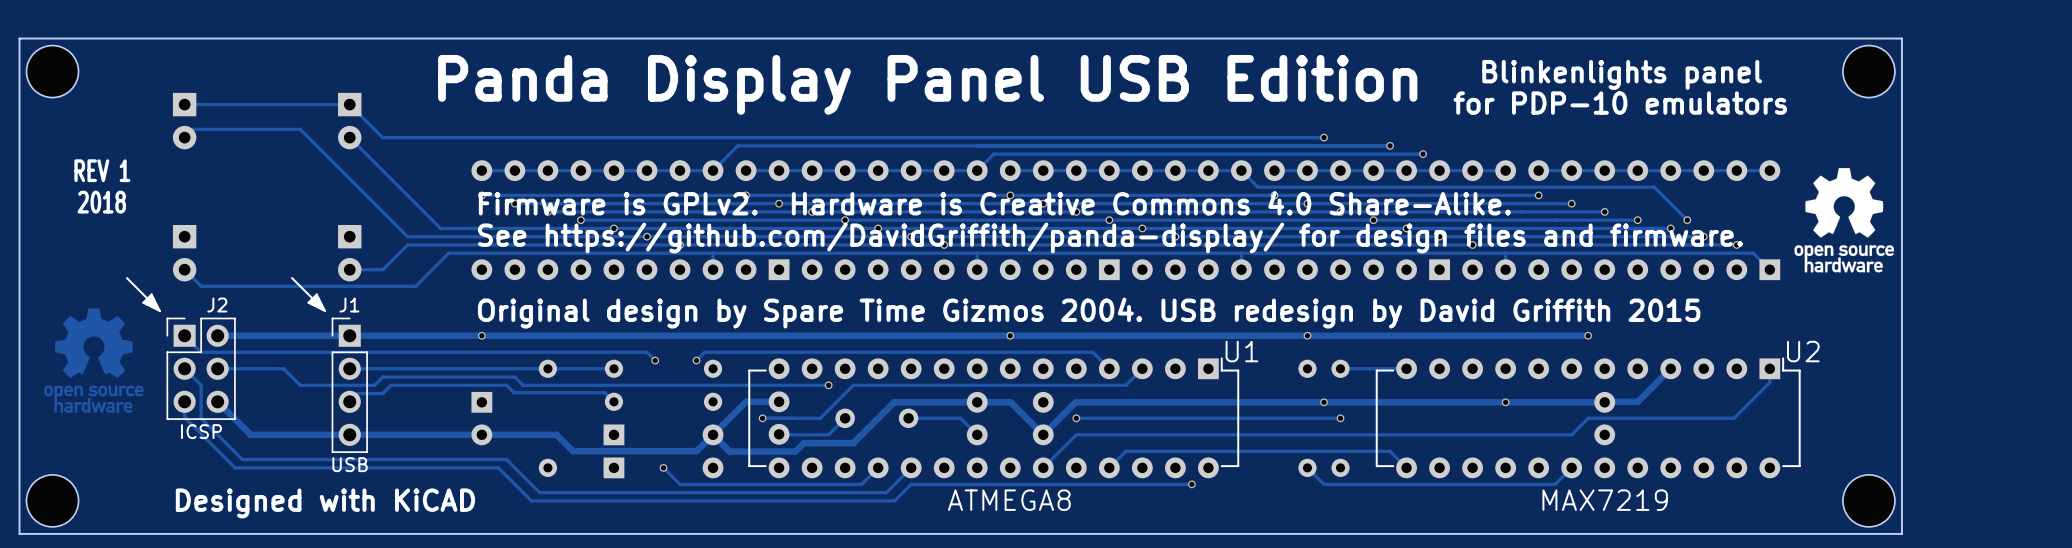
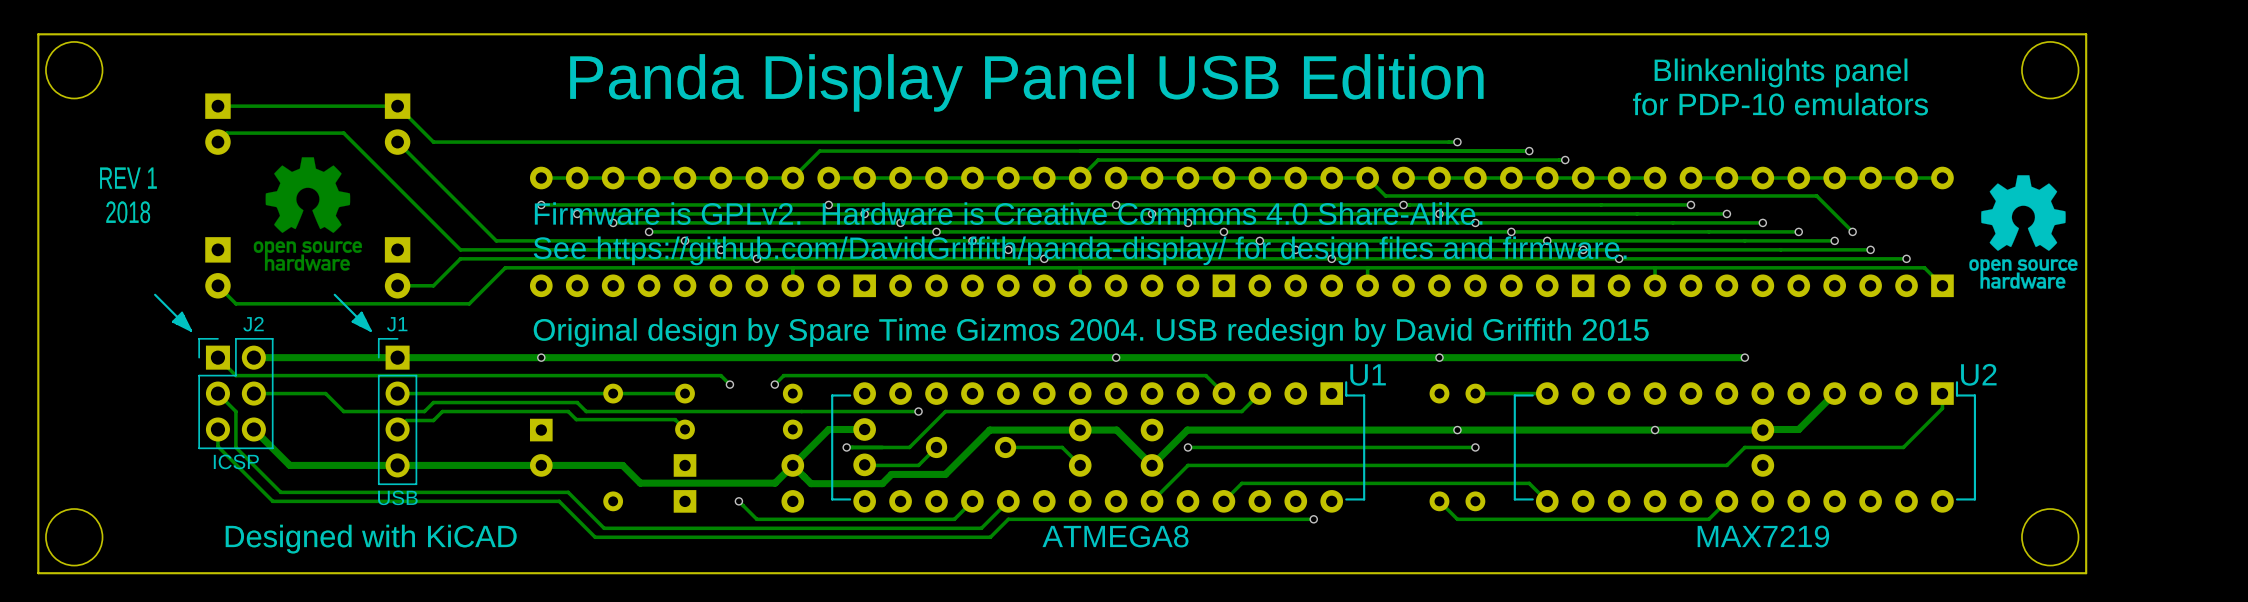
drawing position: (93, 360) -> (307, 214)

